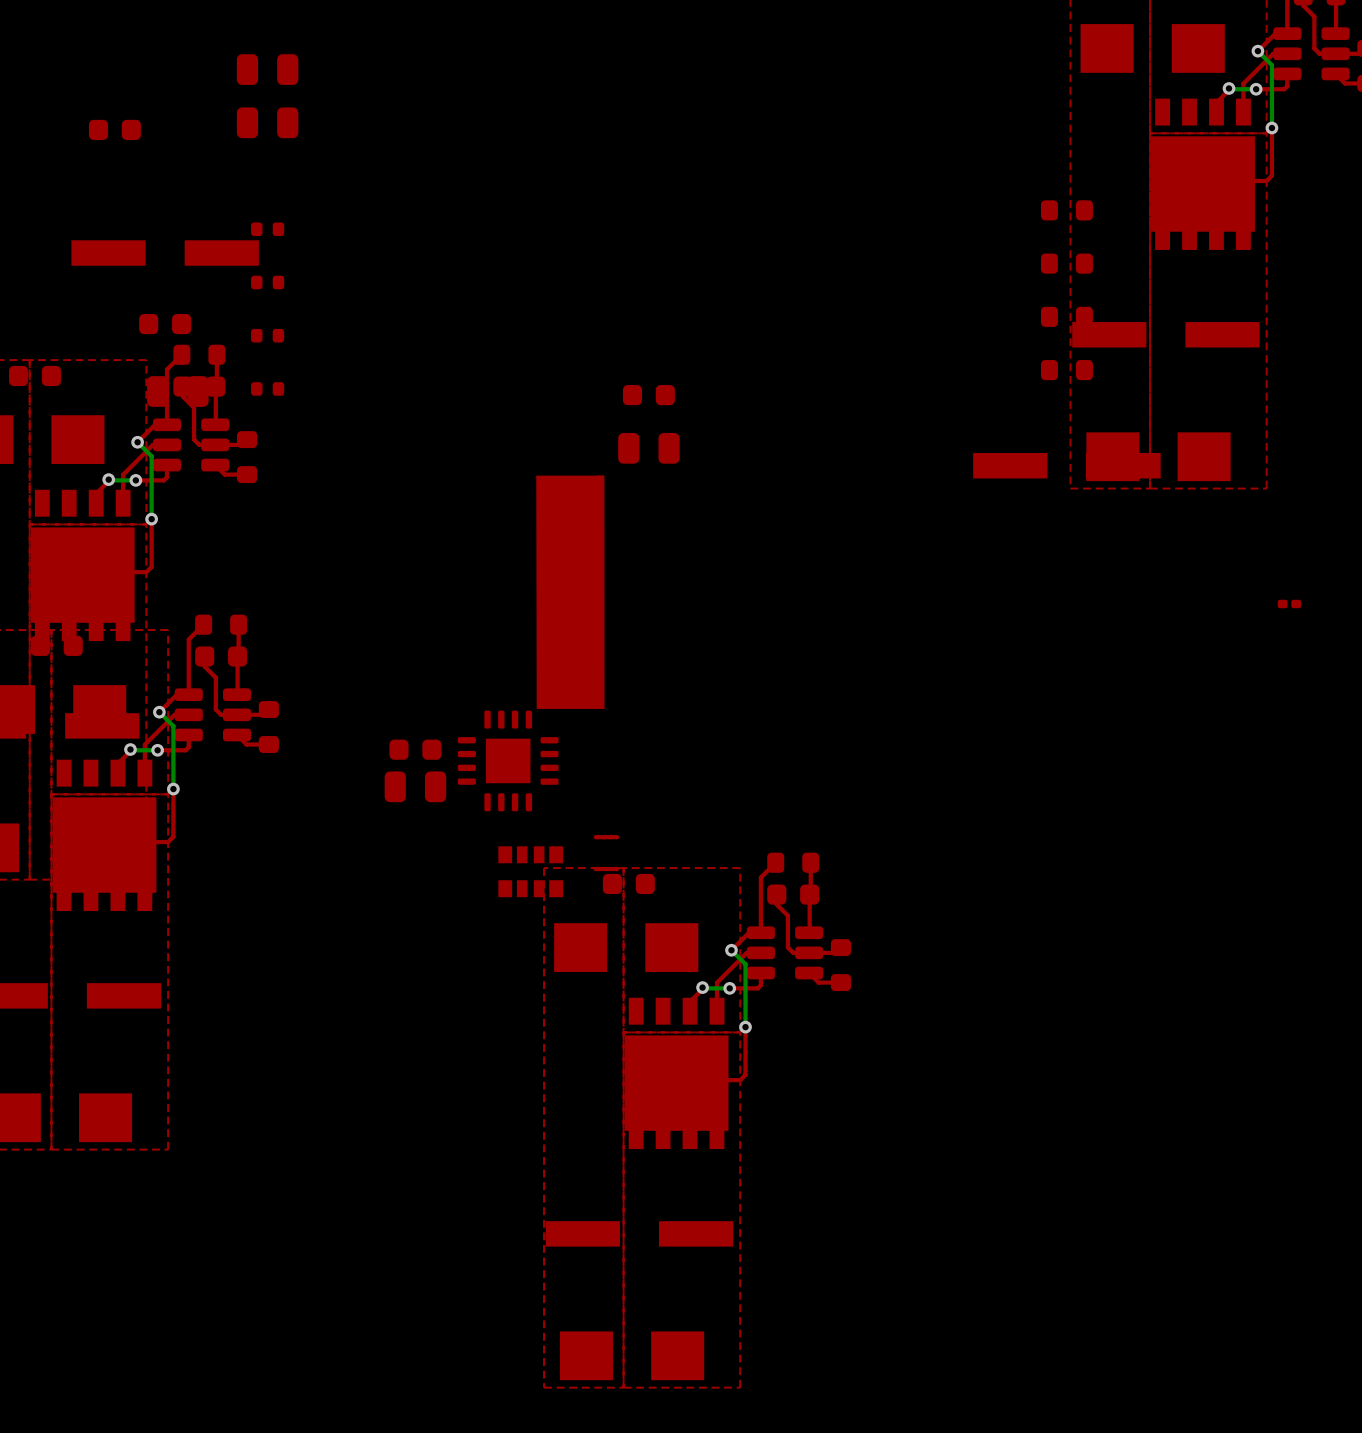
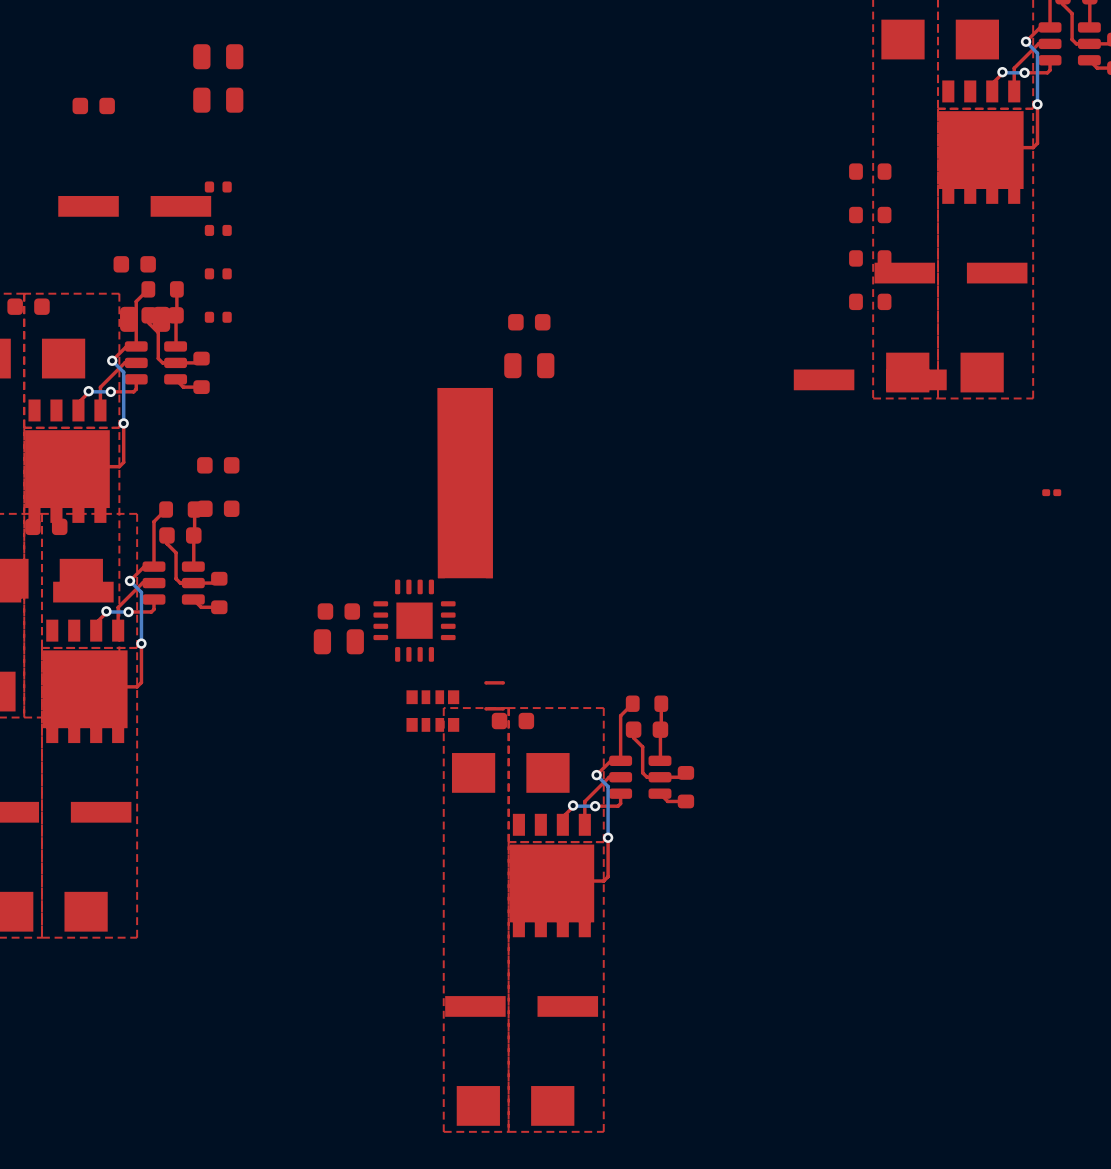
part: none -> (218, 465)
part: none -> (218, 508)

